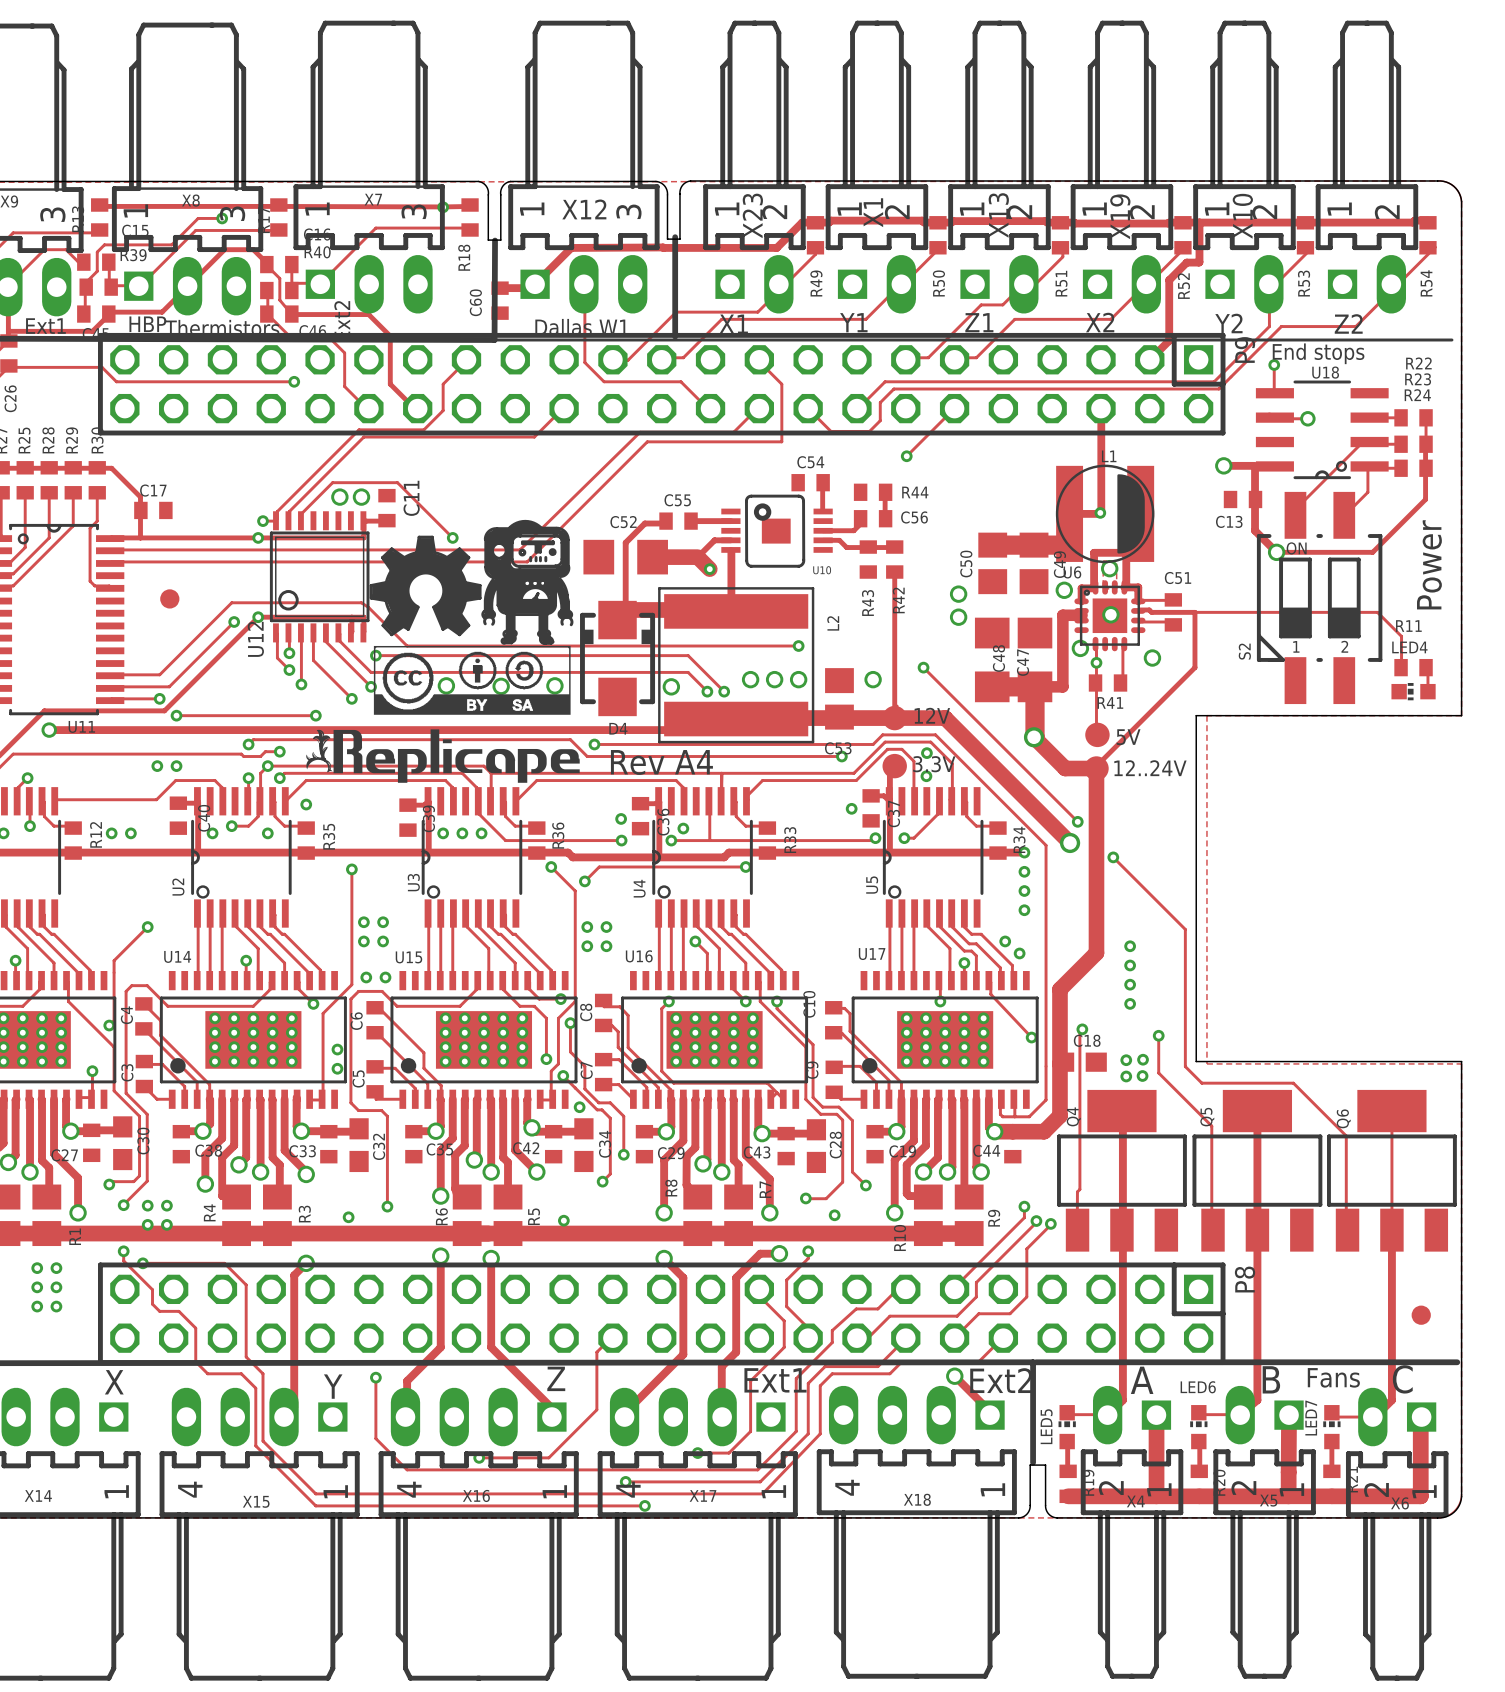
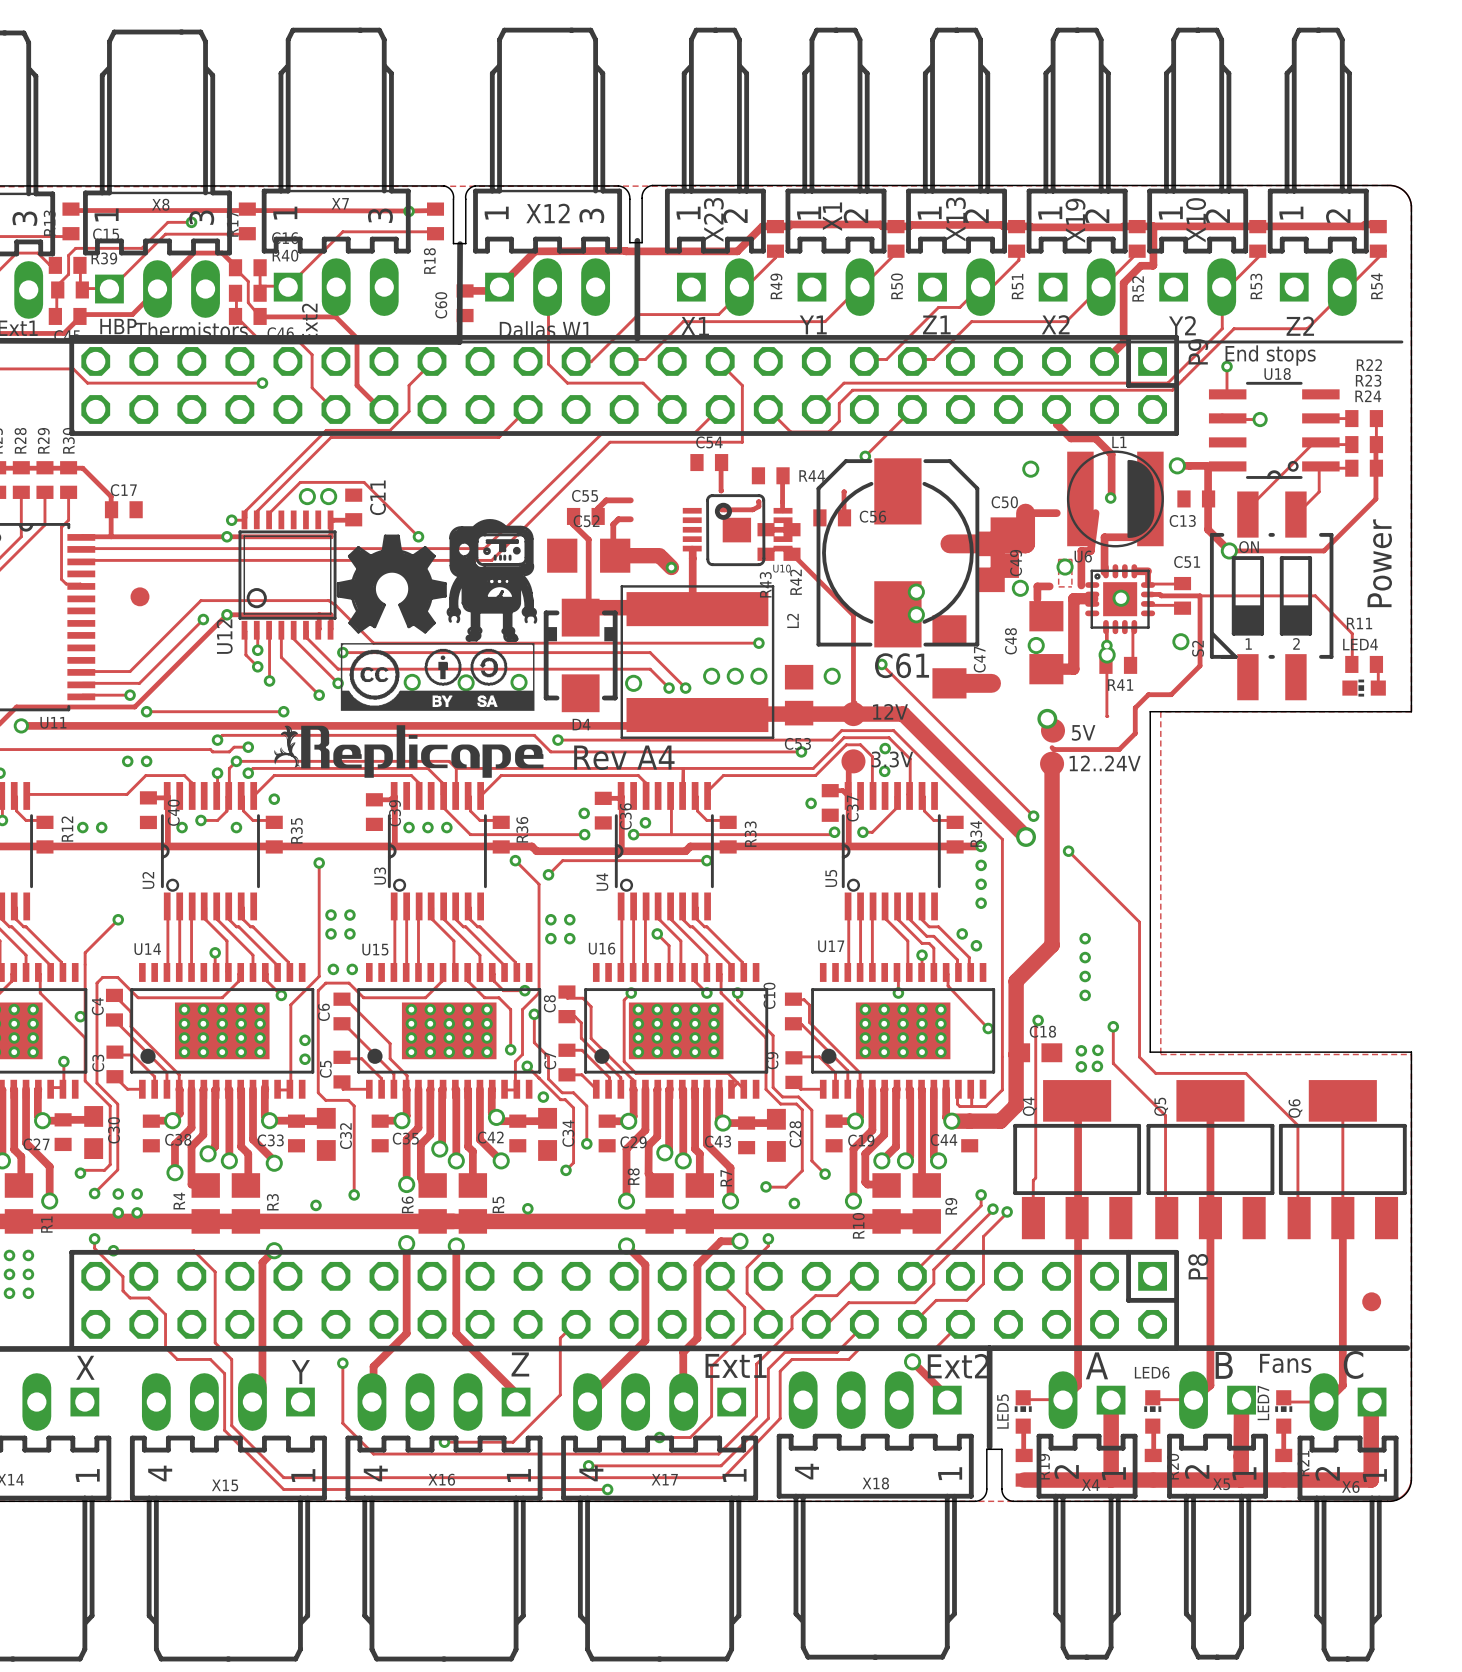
track: (1101, 423) (1100, 512) -> (1056, 424) (1070, 438) (1095, 438) (1111, 454) (1110, 498)
track: none -> (721, 462) (721, 490)
via: none -> (1030, 469)
C54 position: (810, 482) -> (709, 462)
R44 position: (873, 492) -> (770, 475)
track: none -> (630, 500) (606, 500) (598, 508) (598, 516)
track: none -> (758, 501) (758, 506) (752, 509) (721, 509)
via position: (1100, 512) -> (1110, 498)
L1 position: (1105, 513) -> (1115, 498)
track: (860, 518) (861, 523) (853, 530) (823, 530) -> none
track: none -> (630, 519) (618, 519) (613, 524) (613, 553) (615, 555)
track: (666, 521) (666, 523) (644, 523) (625, 542) -> (573, 516) (573, 524) (588, 541)
C55 position: (678, 521) -> (585, 516)
track: (691, 521) (730, 521) -> none
track: (730, 540) (714, 540) (697, 557) -> none
track: (823, 540) (839, 540) (846, 547) (894, 547) -> none
track: (1126, 552) (1094, 552) (1094, 588) (1095, 587) -> (1136, 537) (1104, 537) (1104, 572) (1105, 571)
C61: none -> (897, 552)
R43 position: (868, 559) -> (766, 541)
R42 position: (894, 559) -> (792, 541)
C50 position: (992, 563) -> (1004, 547)
C50 name rotation: 0° (966, 564) -> 90° clockwise (1004, 502)
C50 name position: C50 (966, 564) -> C50 (1004, 502)
track: (894, 572) (894, 617) -> (792, 554) (853, 615)
track: none -> (1134, 571) (1148, 571) (1148, 585) (1182, 583)
track: (1124, 587) (1138, 587) (1138, 601) (1173, 599) -> none
track: none -> (1148, 594) (1200, 595)
track: none -> (1200, 595) (1200, 665) (1171, 694) (1148, 694) (1135, 707) (1135, 733) (1119, 749) (1053, 749) (1052, 747)
track: none -> (1092, 598) (1073, 598) (1073, 669) (1046, 669)
track: (1138, 610) (1194, 612) -> none
C51 position: (1173, 612) -> (1182, 595)
track: (1194, 612) (1377, 612) (1401, 636) -> (1200, 595) (1315, 595) (1352, 633)
track: (1194, 612) (1194, 667) (1096, 766) -> none
via position: (1110, 614) -> (1121, 598)
track: (1082, 615) (1062, 615) (1062, 686) (1035, 686) (1034, 737) (1065, 768) (1096, 768) -> none
U6 position: (1109, 615) -> (1120, 599)
track: (1138, 620) (1170, 621) (1173, 624) -> (1148, 603) (1180, 605) (1182, 608)
track: none -> (1106, 628) (1105, 627) (1104, 626) (1106, 626) (1107, 716)
track: (1124, 644) (1122, 679) (1120, 683) -> (1134, 627) (1132, 662) (1130, 665)
via: none -> (1180, 641)
track: (1096, 646) (1095, 644) (1094, 643) (1096, 643) (1096, 682) (1095, 683) (1096, 726) -> none
C48 position: (1035, 659) -> (1046, 642)
via position: (1096, 662) -> (1106, 645)
R41 position: (1108, 683) -> (1118, 665)
via position: (1034, 737) -> (1047, 718)

